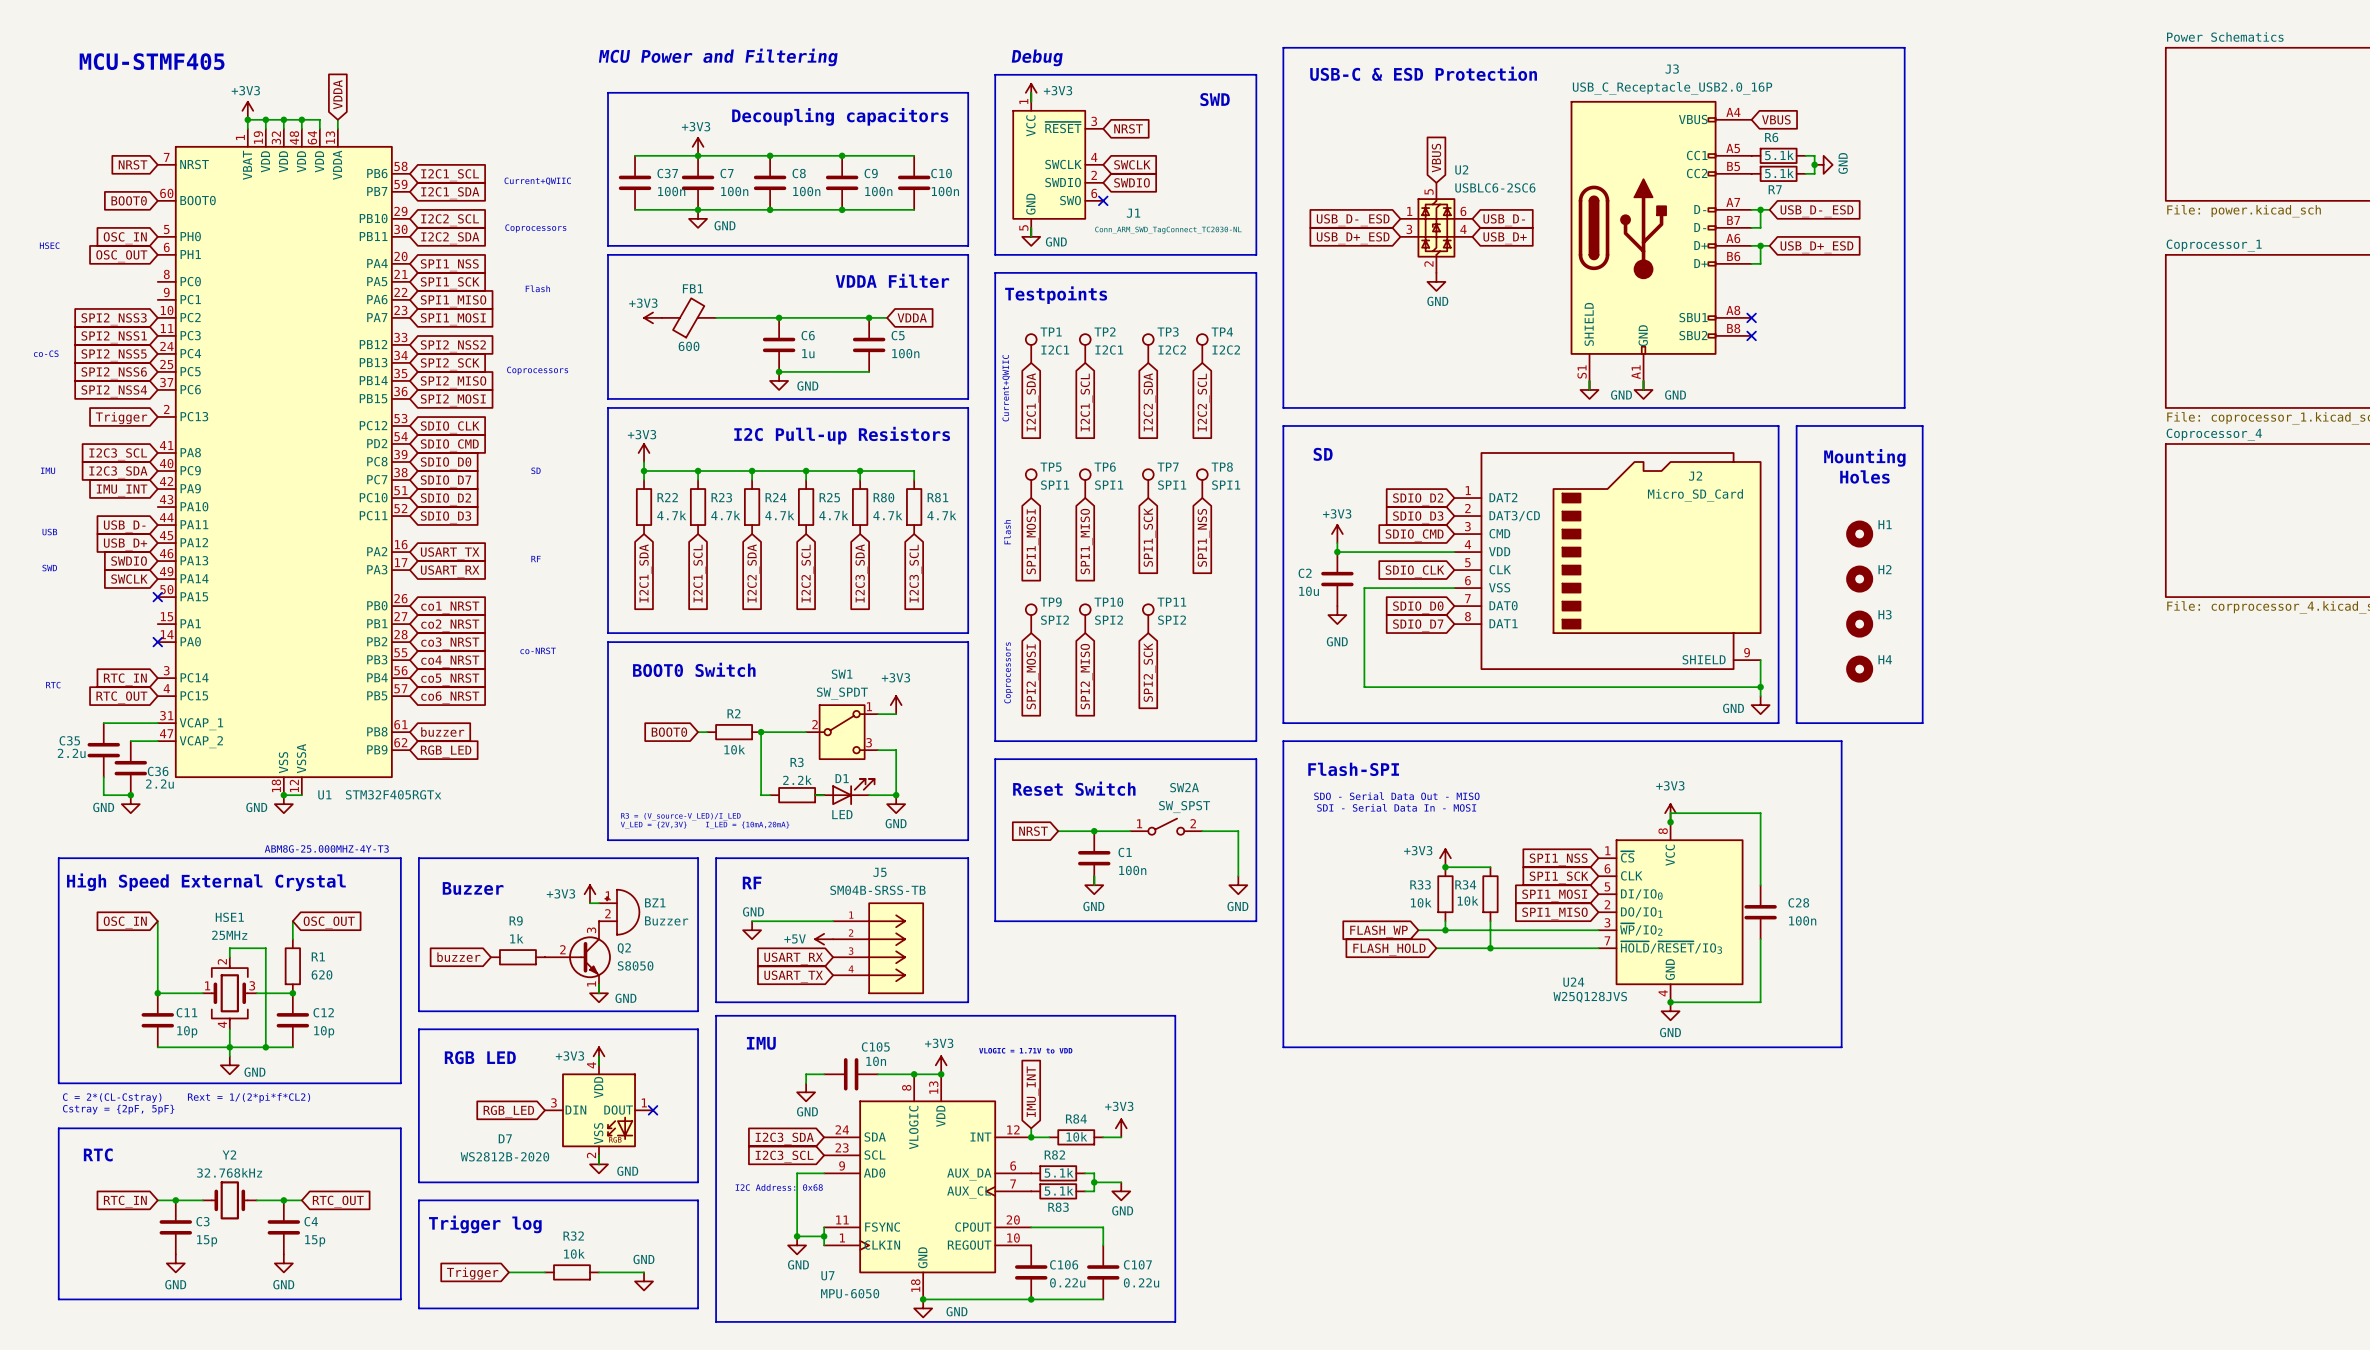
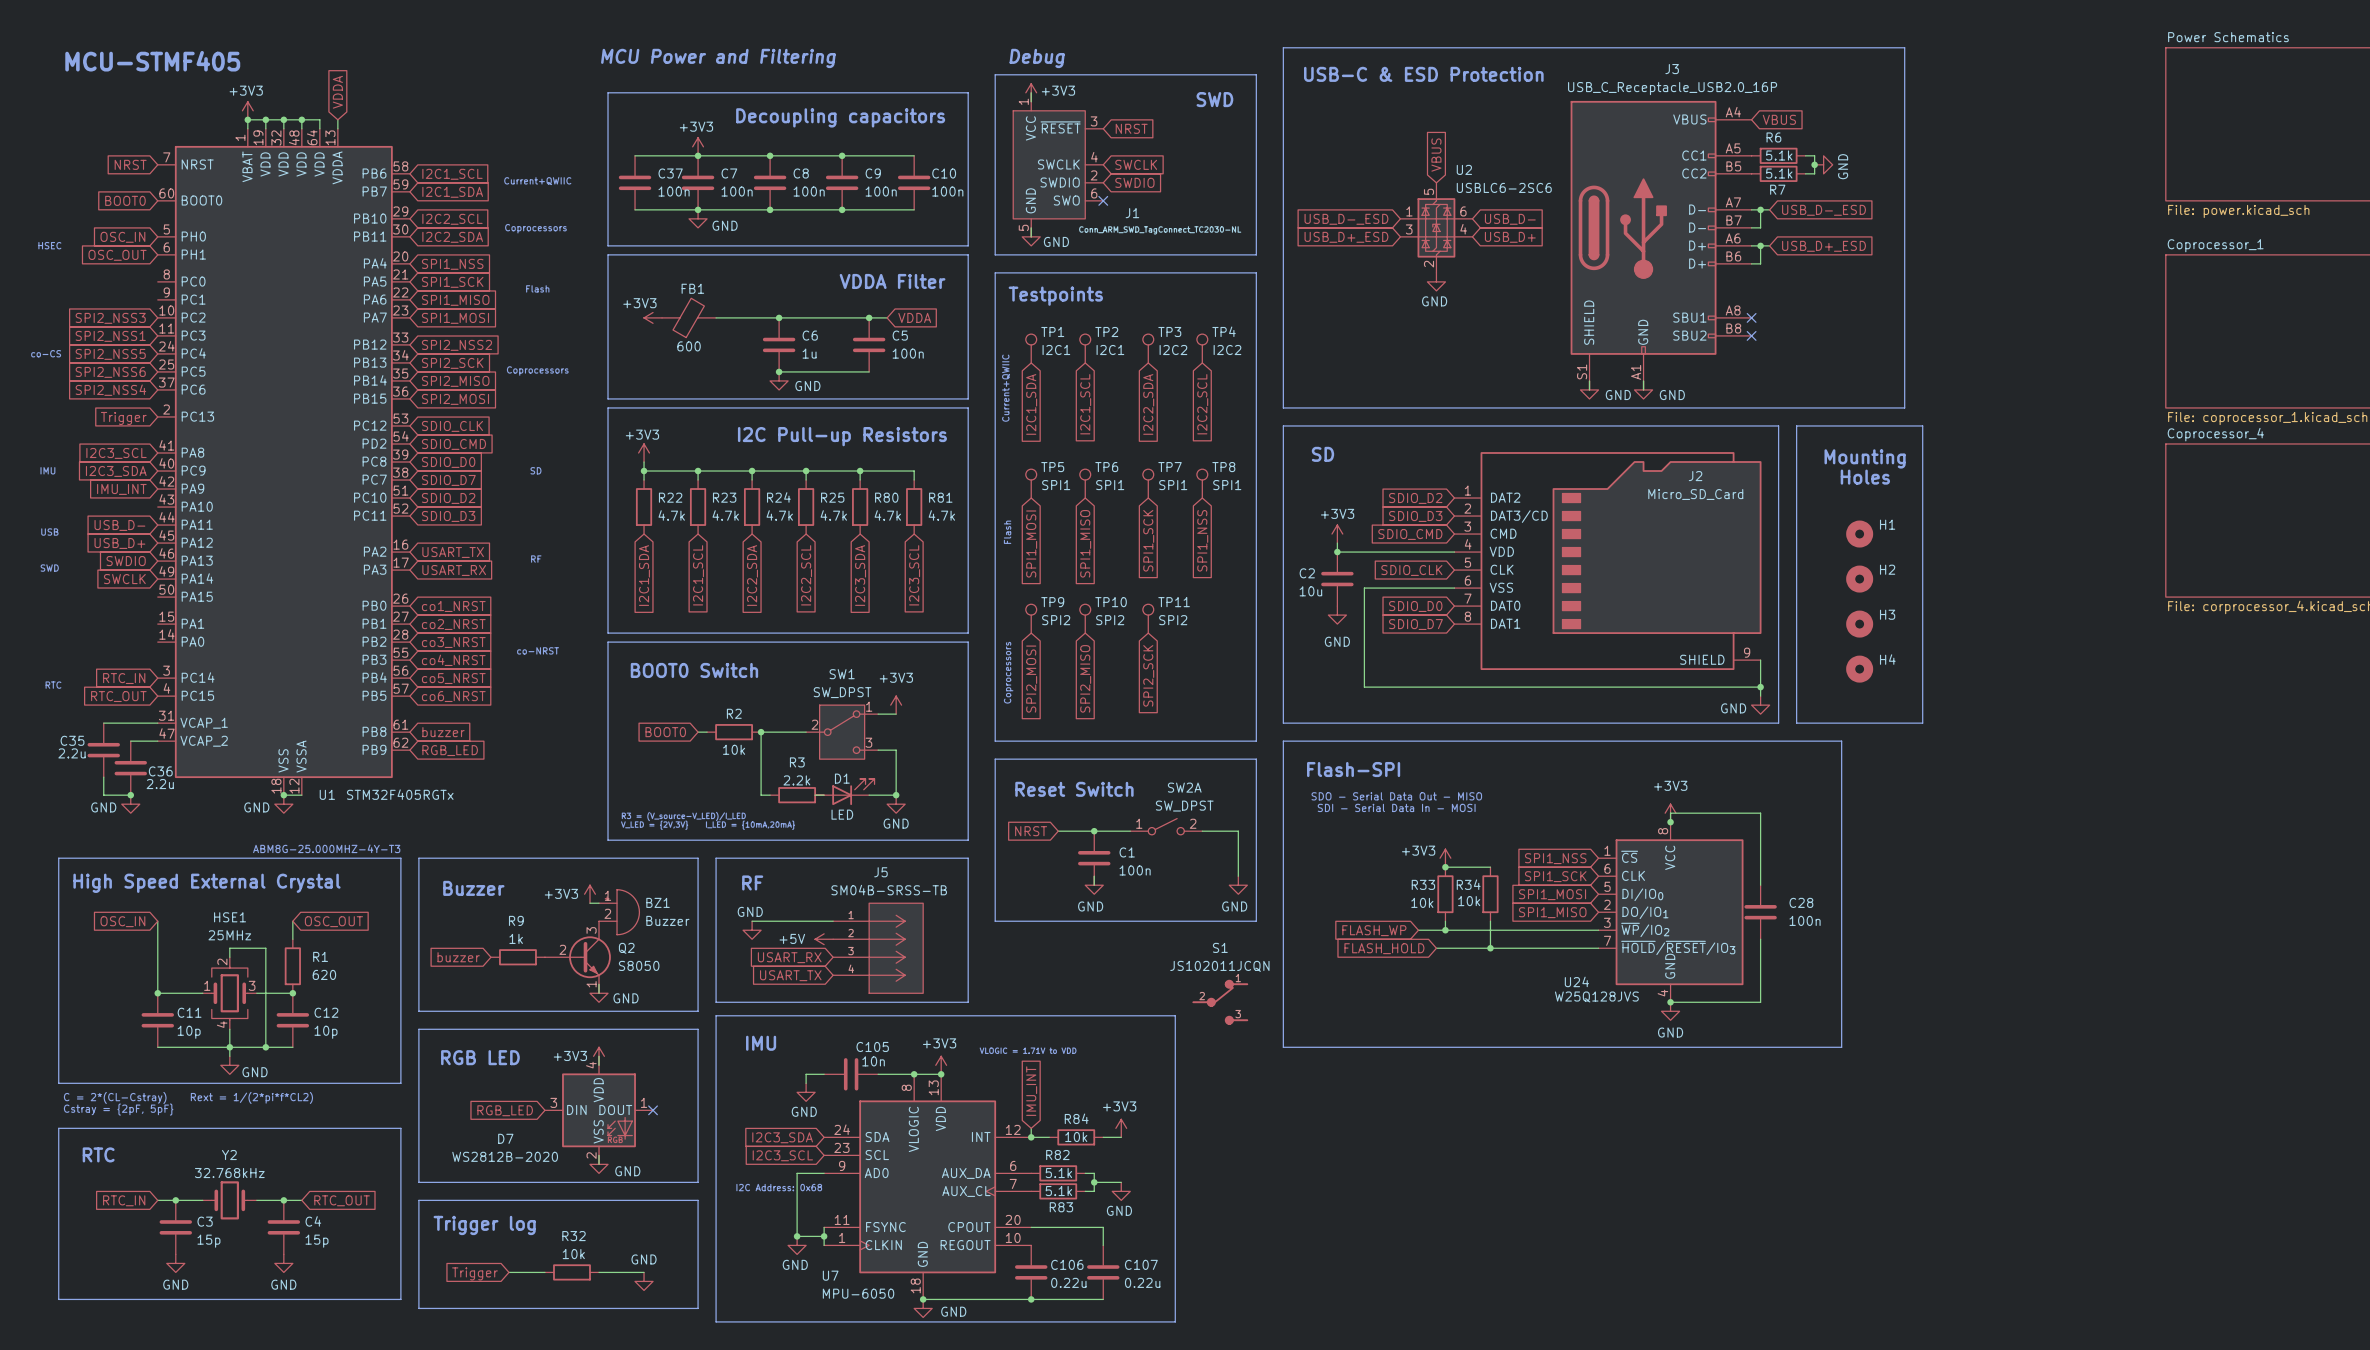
no-connect mark: (157, 597) -> none
no-connect mark: (157, 642) -> none
SW1 value: SW_SPDT (842, 693) -> SW_DPST (842, 692)
SW2A value: SW_SPST (1184, 807) -> SW_DPST (1184, 806)
S1: none -> JS102011JCQN (1220, 1002)

